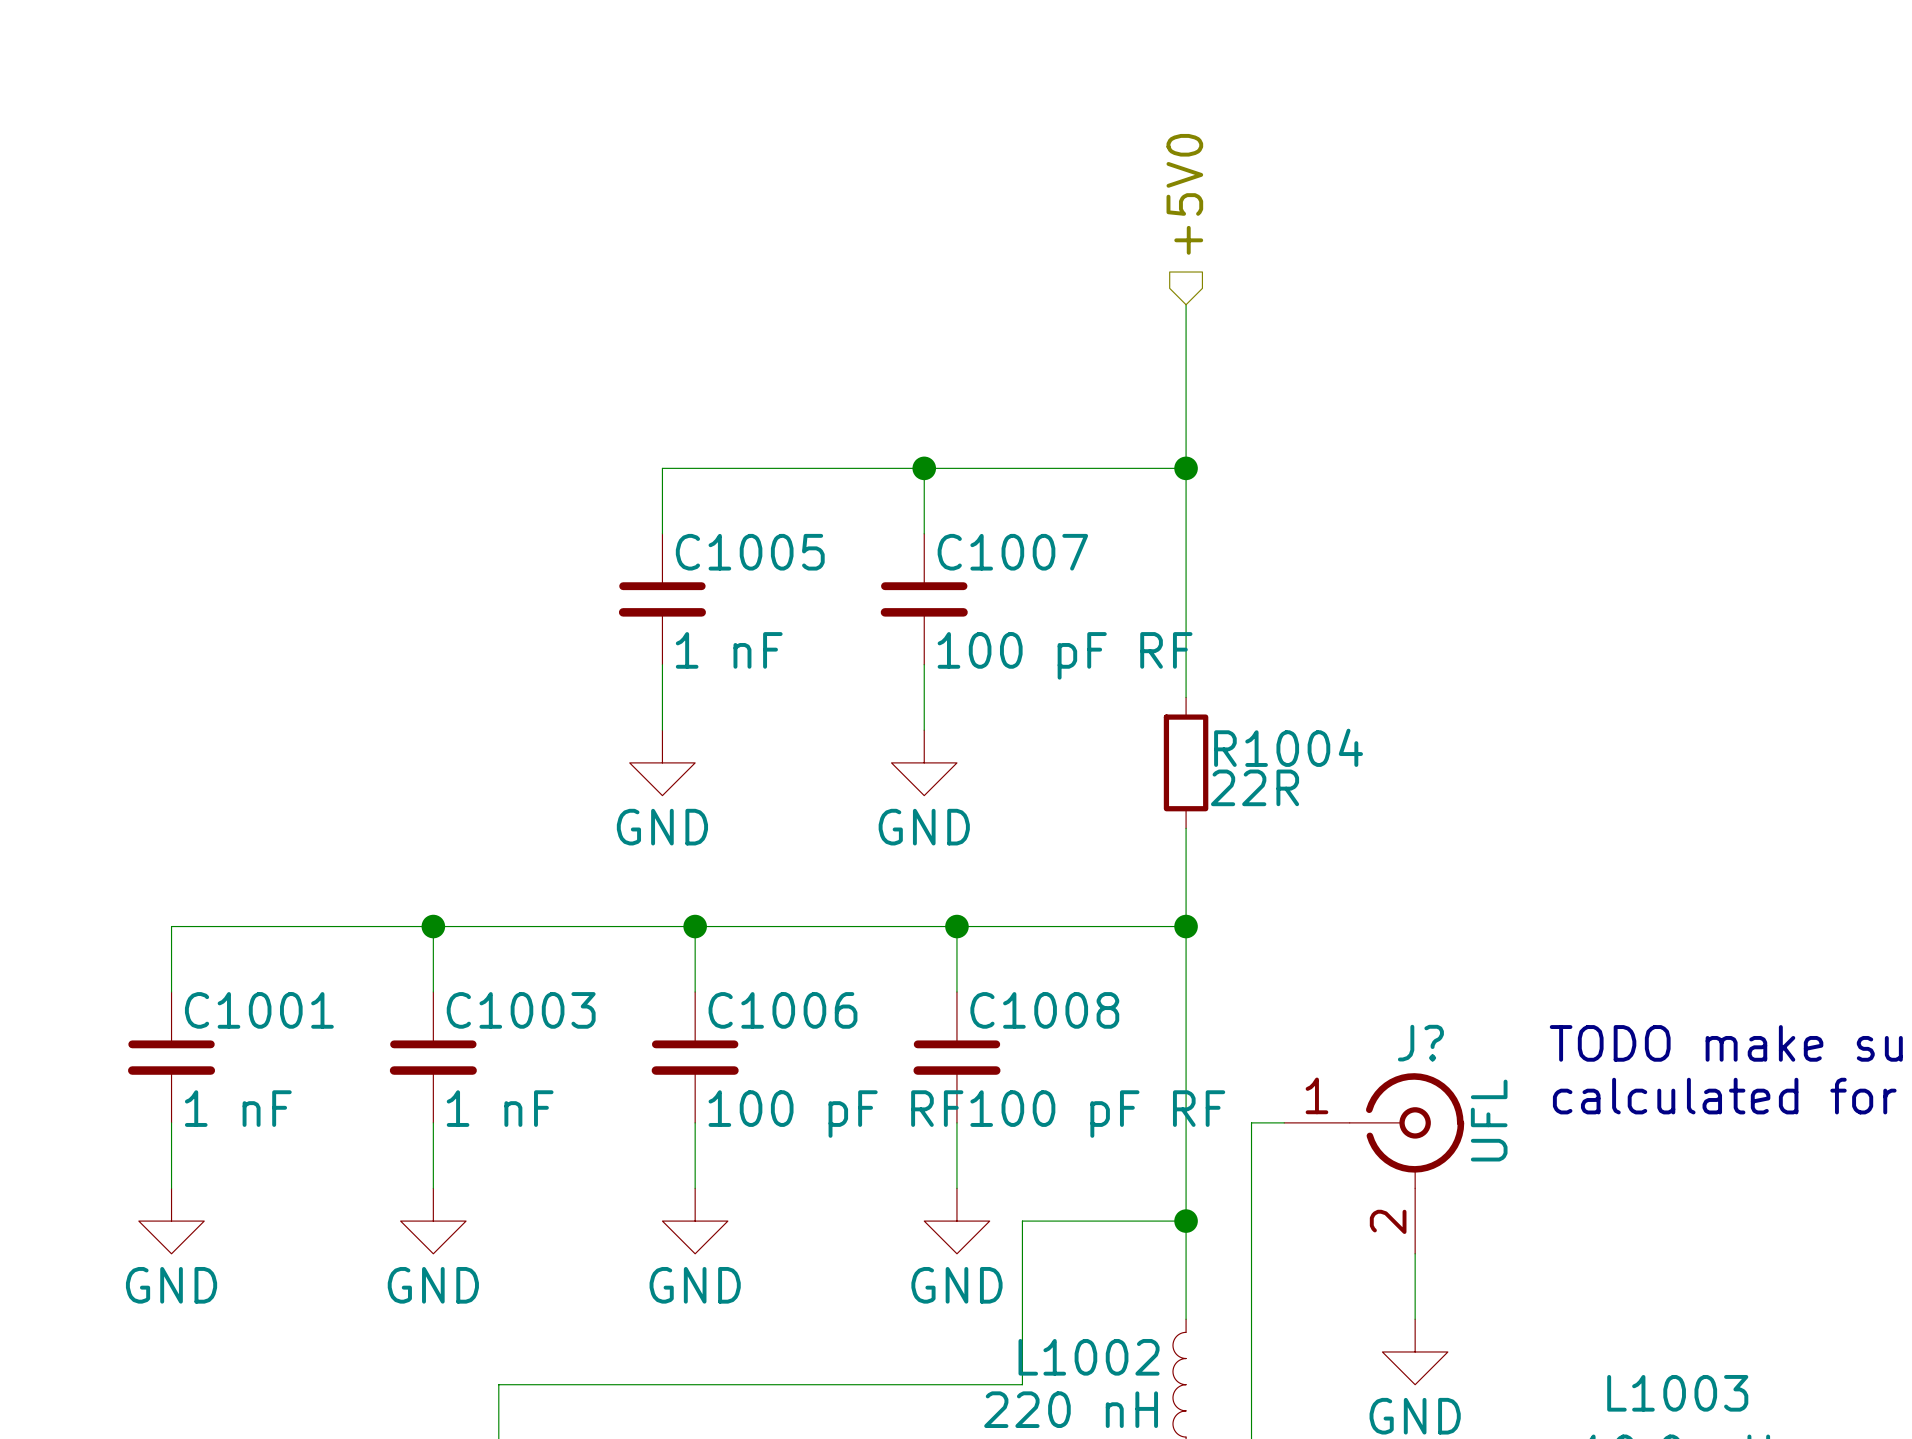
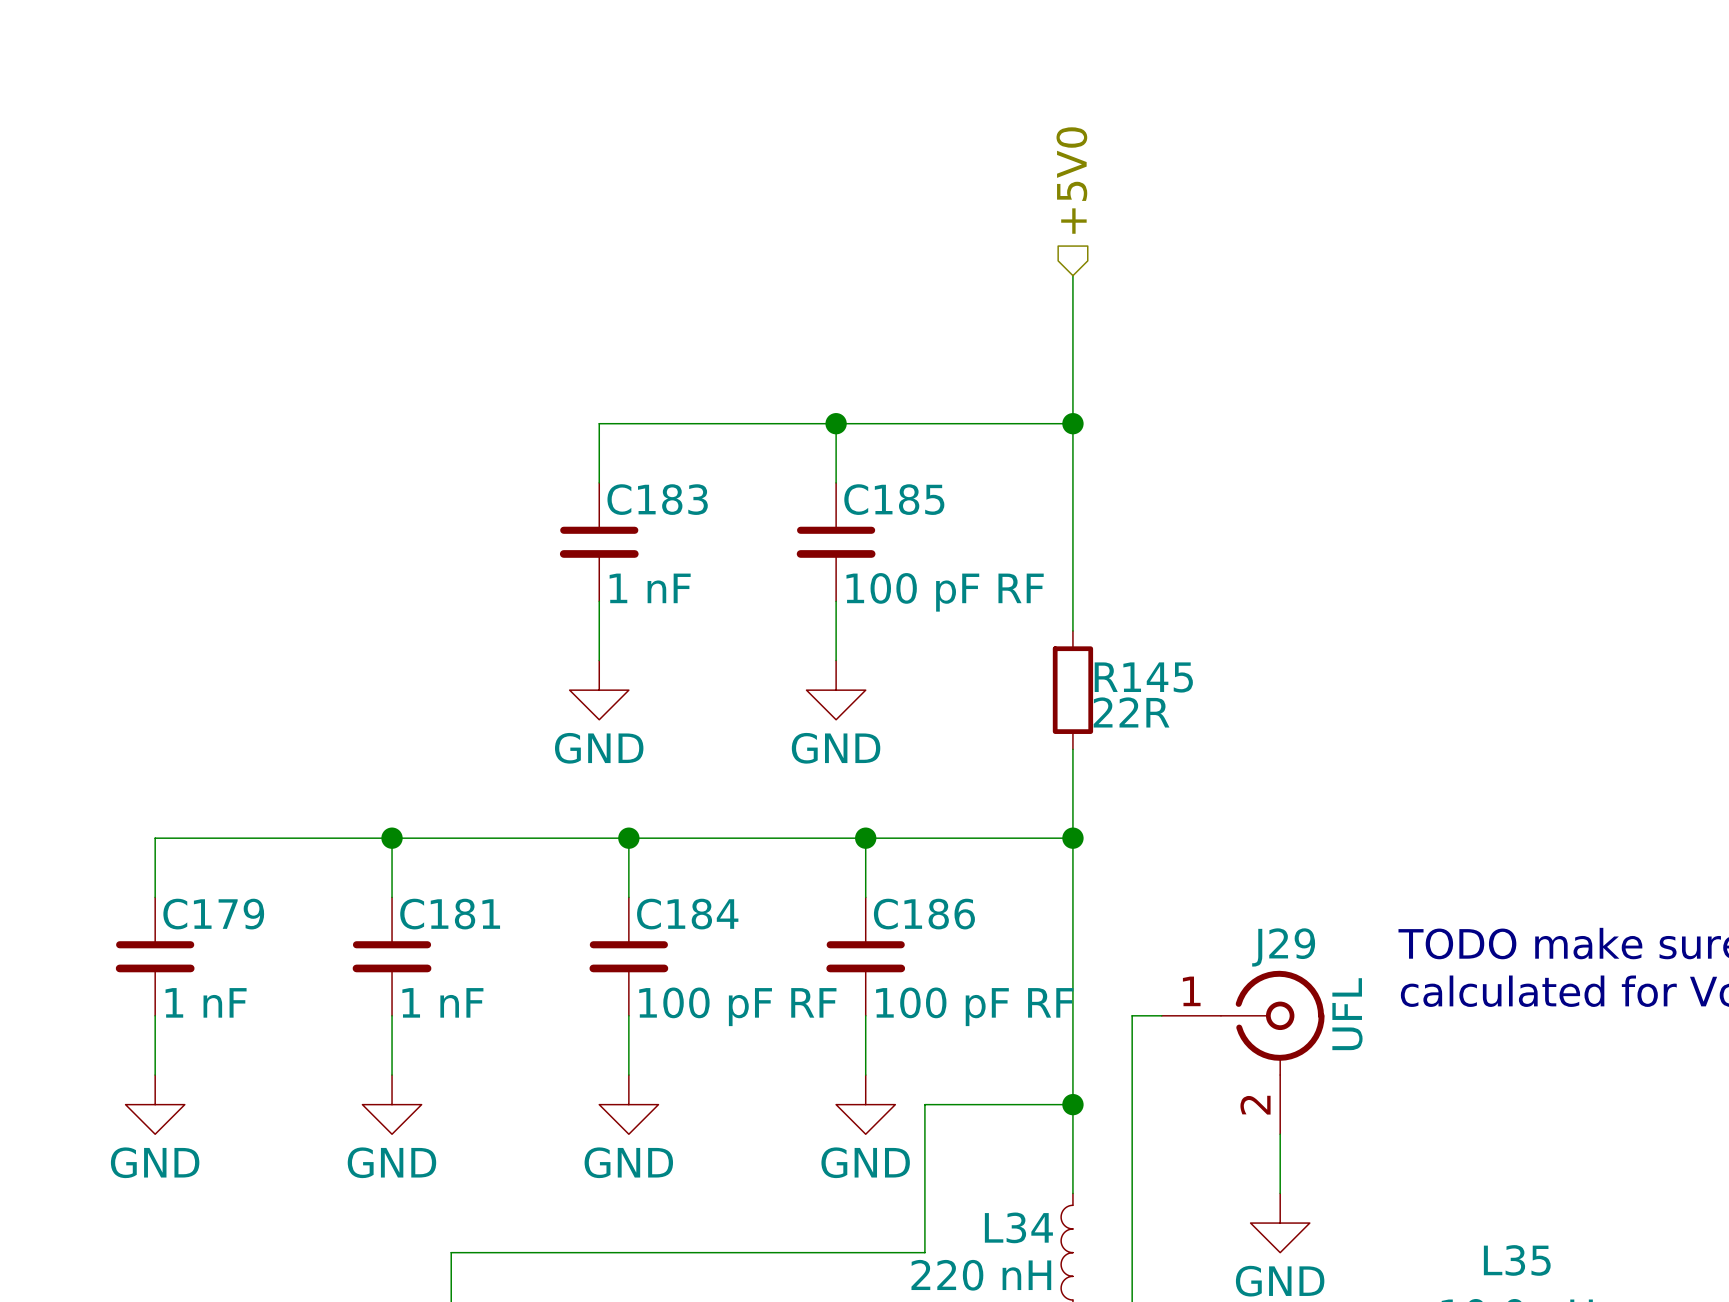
C1005 name: C1005 (750, 552) -> C183 (657, 499)
C1007 name: C1007 (1012, 552) -> C185 (894, 499)
R1004 name: R1004 (1288, 747) -> R145 (1143, 677)
C1001 name: C1001 (259, 1010) -> C179 (213, 914)
C1003 name: C1003 (521, 1010) -> C181 (450, 914)
C1006 name: C1006 (782, 1010) -> C184 (687, 914)
C1008 name: C1008 (1044, 1010) -> C186 (924, 914)
J? name: J? (1420, 1043) -> J29 (1283, 947)
L1002 name: L1002 (1089, 1357) -> L34 (1018, 1227)
L1003 name: L1003 (1677, 1393) -> L35 (1517, 1260)

